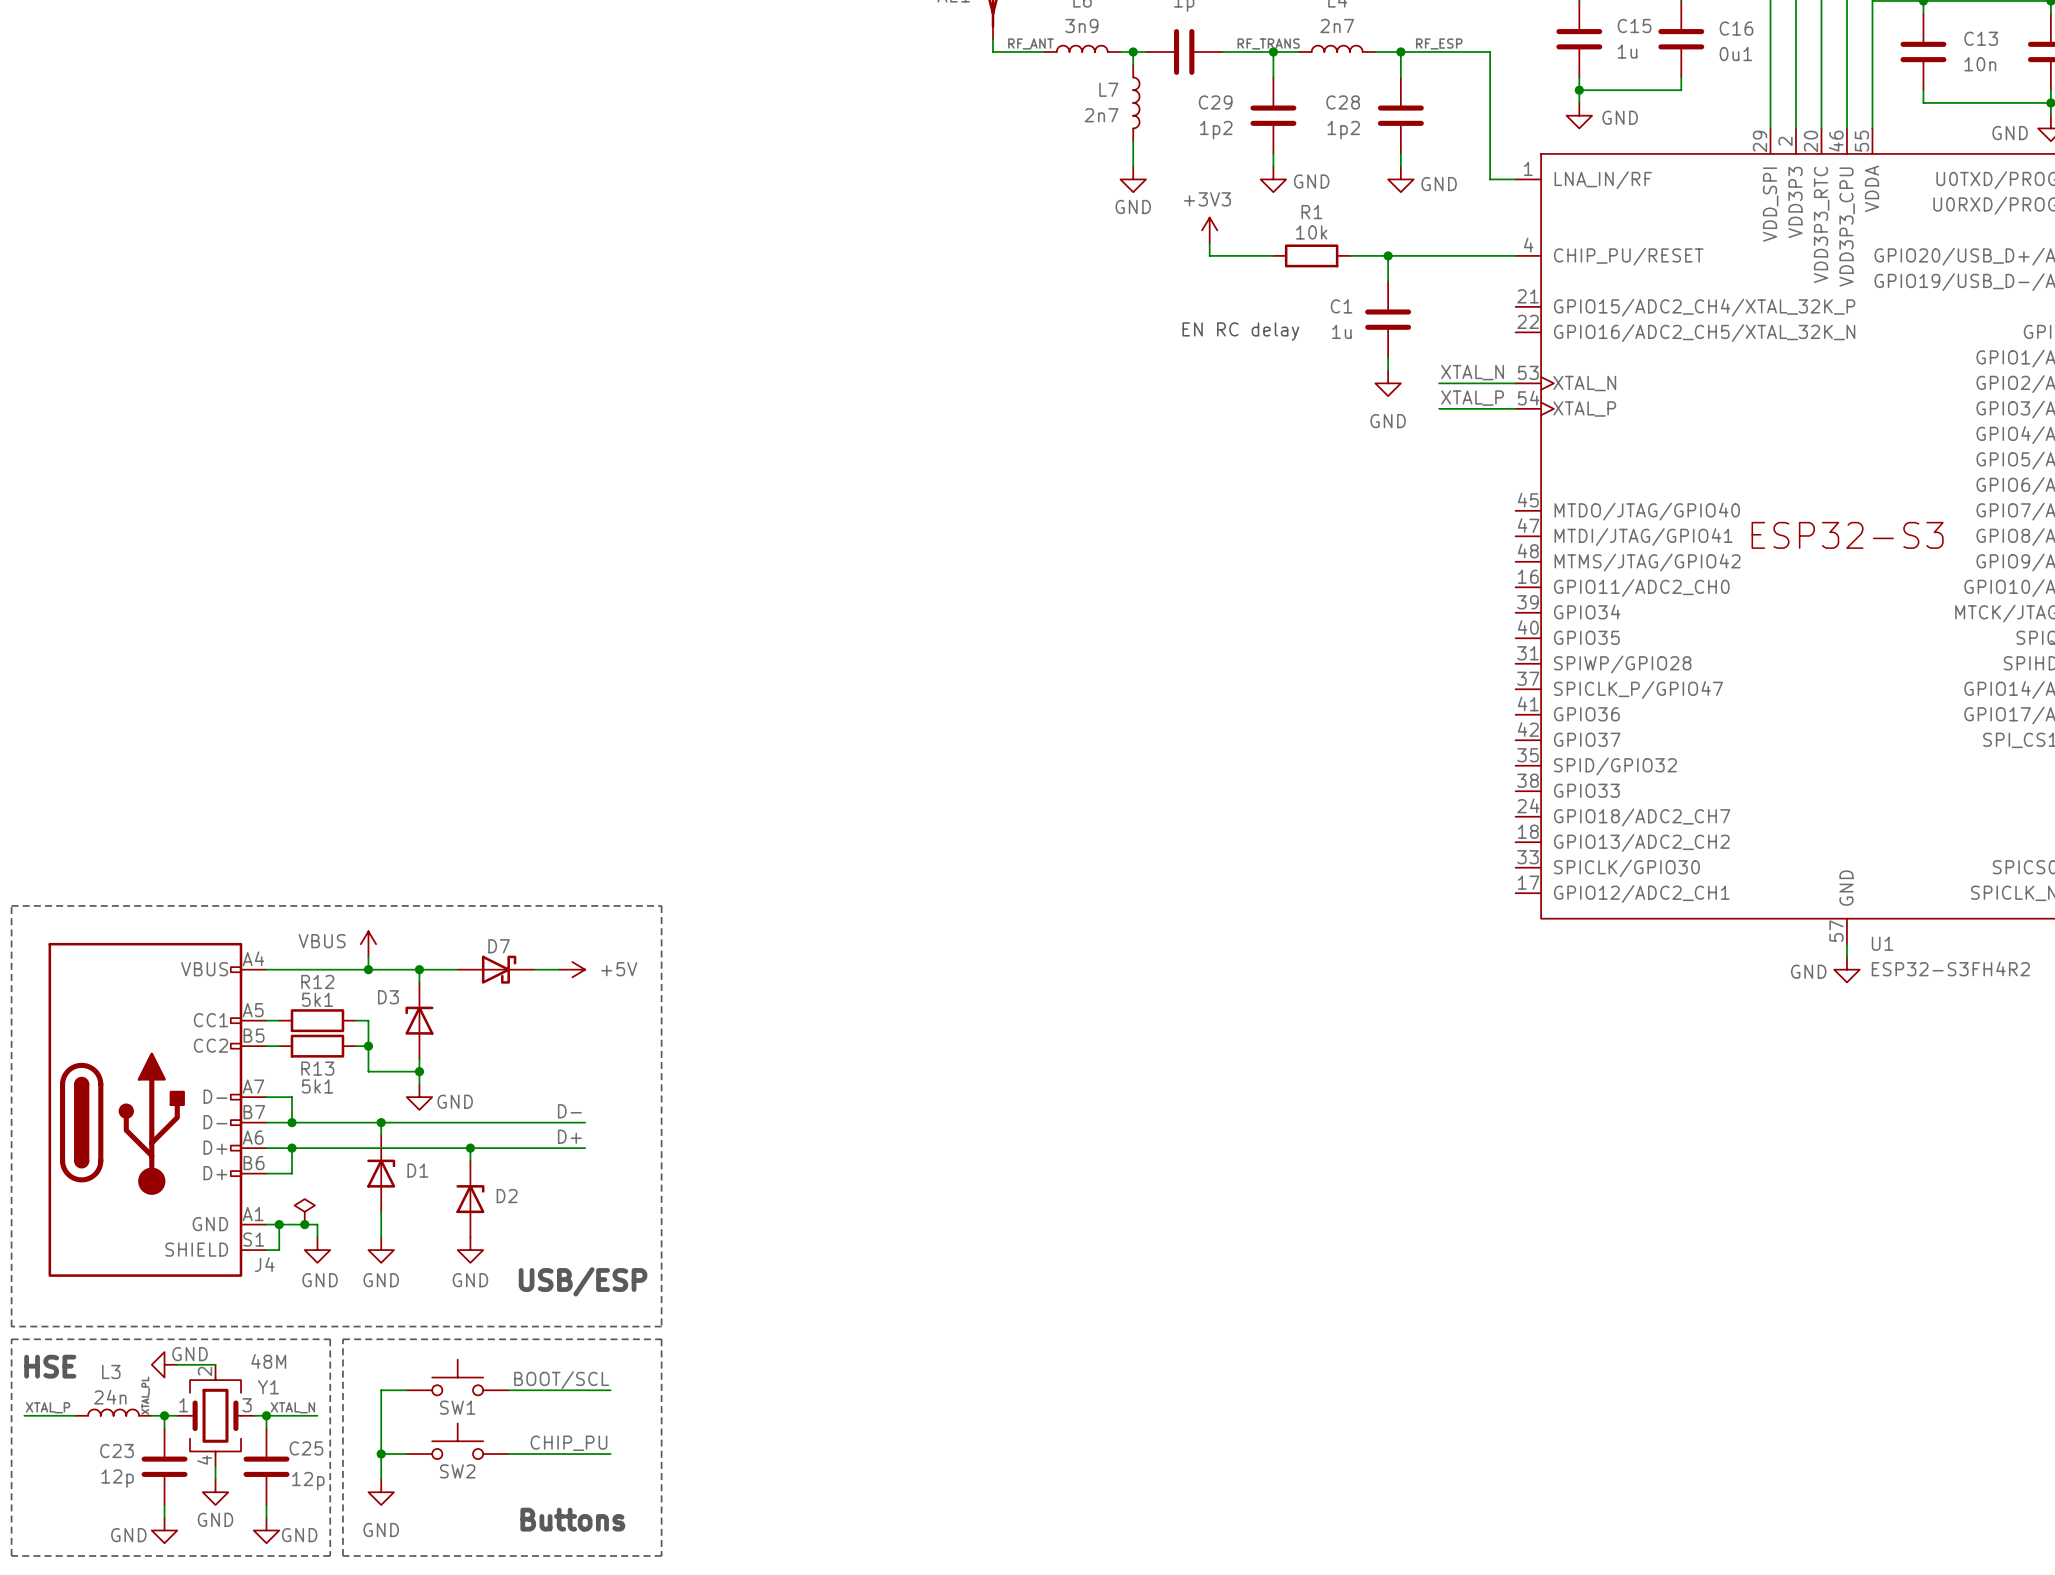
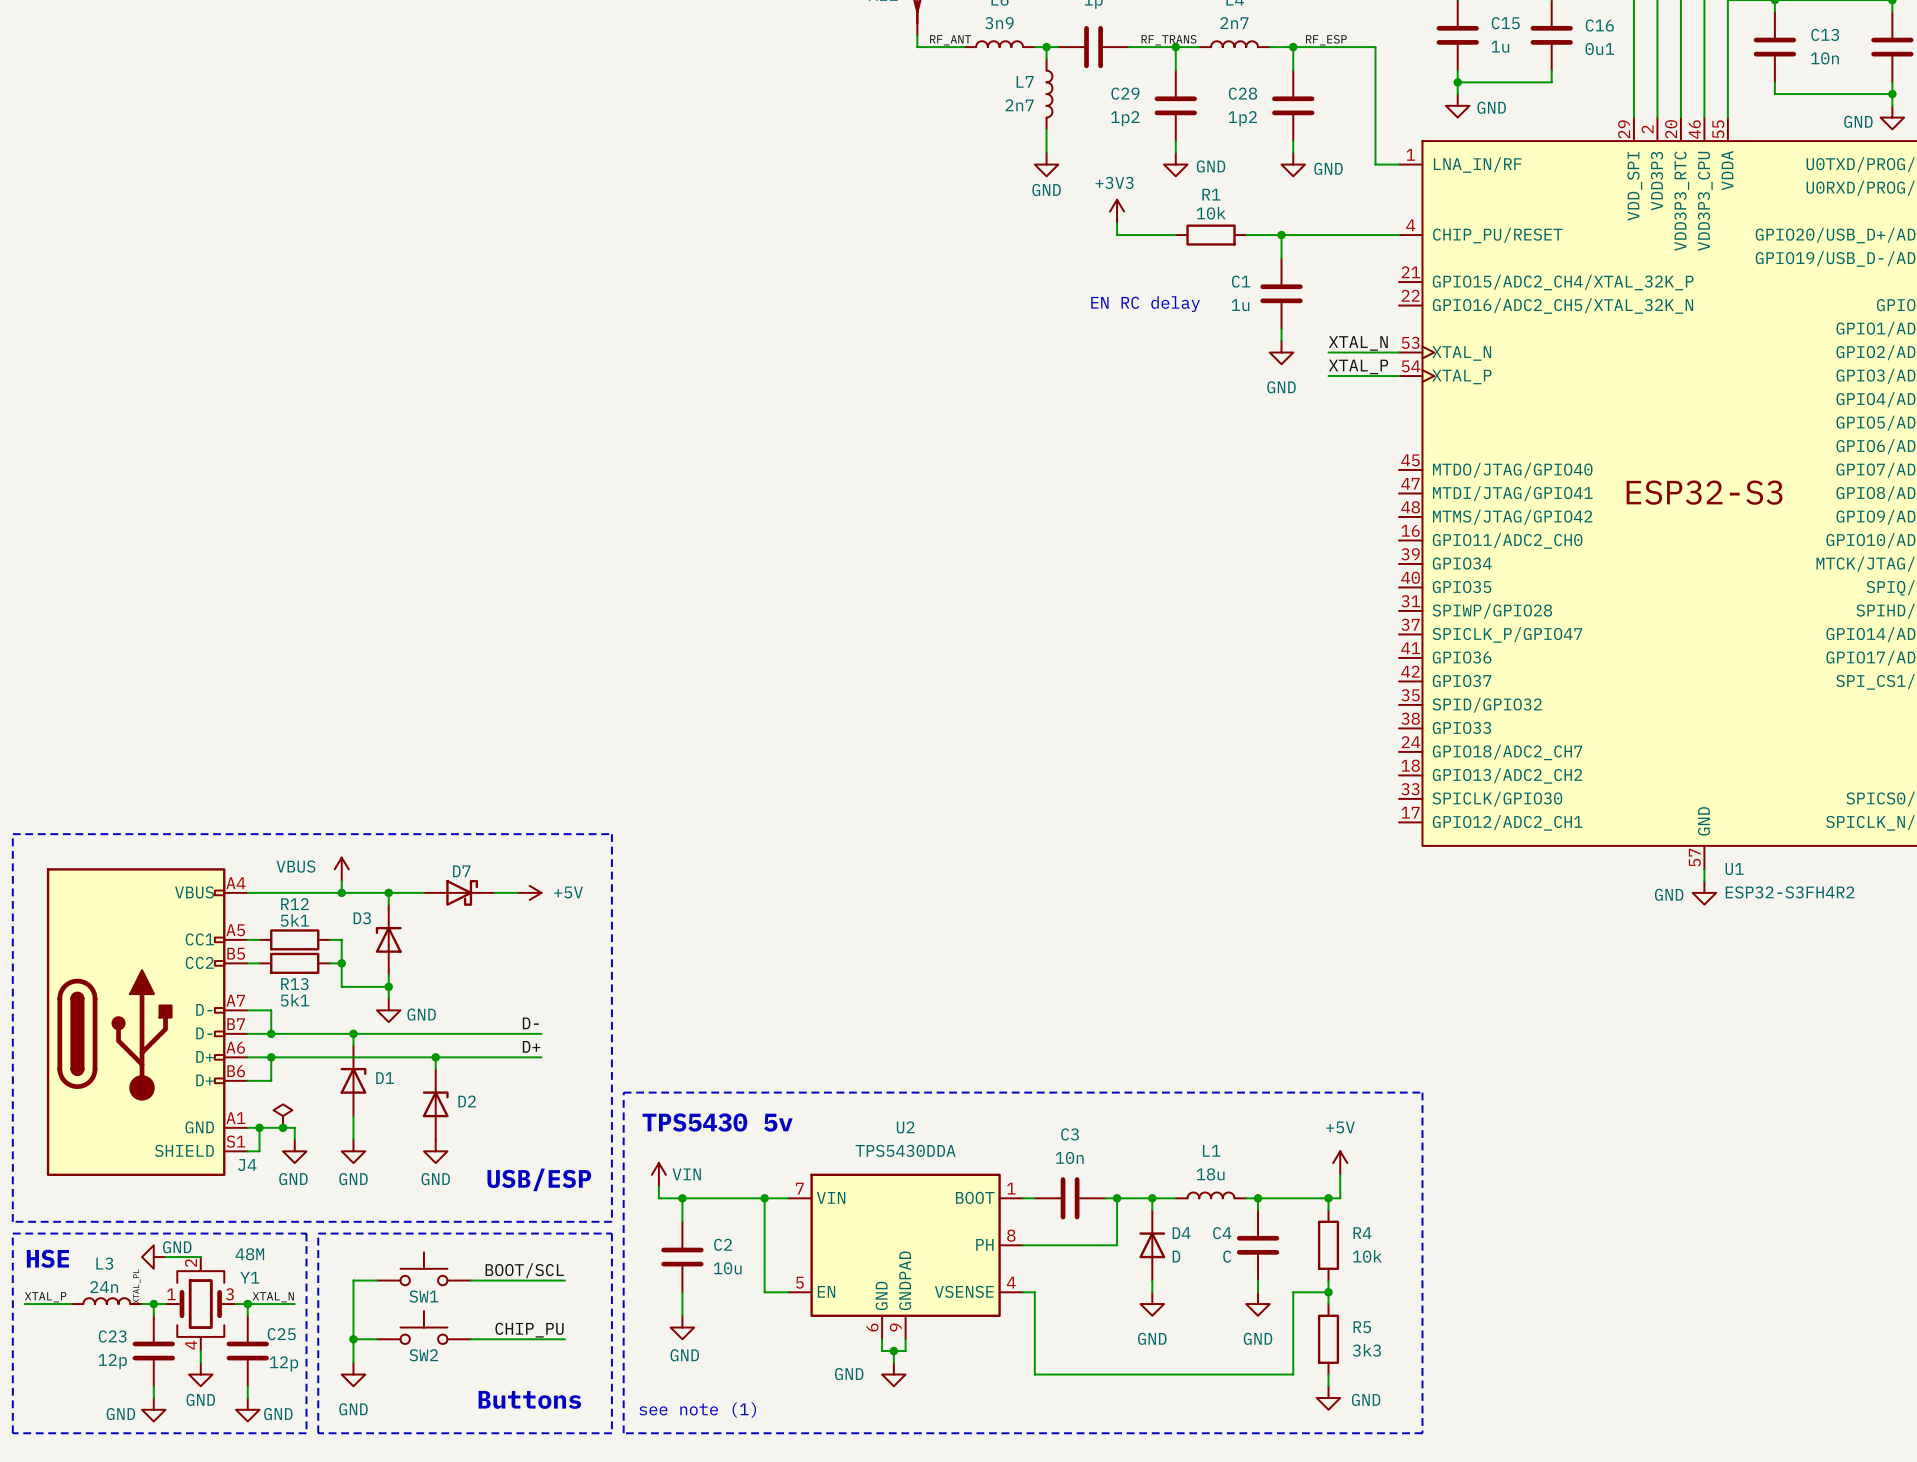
line: none -> (623, 1092) (1422, 1092) (1422, 1433) (623, 1433) (623, 1092)
text: none -> TPS5430 5v (717, 1122)
power symbol: none -> +5V (1340, 1163)
power symbol: none -> VIN (658, 1174)
wire: none -> (1340, 1174) (1340, 1198) (1246, 1198)
wire: none -> (658, 1186) (658, 1198) (788, 1198)
L1: none -> 18u (1211, 1195)
wire: none -> (682, 1198) (682, 1221)
junction: none -> (682, 1198)
wire: none -> (764, 1198) (764, 1292) (788, 1292)
junction: none -> (764, 1198)
wire: none -> (1023, 1198) (1034, 1198)
C3: none -> 10n (1070, 1198)
wire: none -> (1105, 1198) (1175, 1198)
wire: none -> (1117, 1198) (1117, 1245) (1023, 1245)
junction: none -> (1117, 1198)
wire: none -> (1152, 1198) (1152, 1210)
junction: none -> (1152, 1198)
wire: none -> (1258, 1198) (1258, 1210)
junction: none -> (1258, 1198)
wire: none -> (1328, 1198) (1328, 1210)
junction: none -> (1328, 1198)
D4: none -> D (1152, 1245)
C4: none -> C (1258, 1245)
R4: none -> 10k (1328, 1245)
C2: none -> 10u (682, 1257)
U2: none -> TPS5430DDA (905, 1256)
wire: none -> (1152, 1280) (1152, 1292)
wire: none -> (1258, 1280) (1258, 1292)
wire: none -> (1328, 1280) (1328, 1304)
wire: none -> (682, 1292) (682, 1315)
wire: none -> (1023, 1292) (1034, 1292) (1034, 1374) (1293, 1374) (1293, 1292) (1328, 1292)
junction: none -> (1328, 1292)
power symbol: none -> GND (1152, 1304)
power symbol: none -> GND (1258, 1304)
power symbol: none -> GND (682, 1327)
wire: none -> (882, 1339) (882, 1351) (905, 1351) (905, 1339)
R5: none -> 3k3 (1328, 1339)
wire: none -> (893, 1351) (893, 1362)
junction: none -> (893, 1351)
power symbol: none -> GND (893, 1374)
wire: none -> (1328, 1374) (1328, 1386)
power symbol: none -> GND (1328, 1398)
text: none -> see note (1) (697, 1410)

